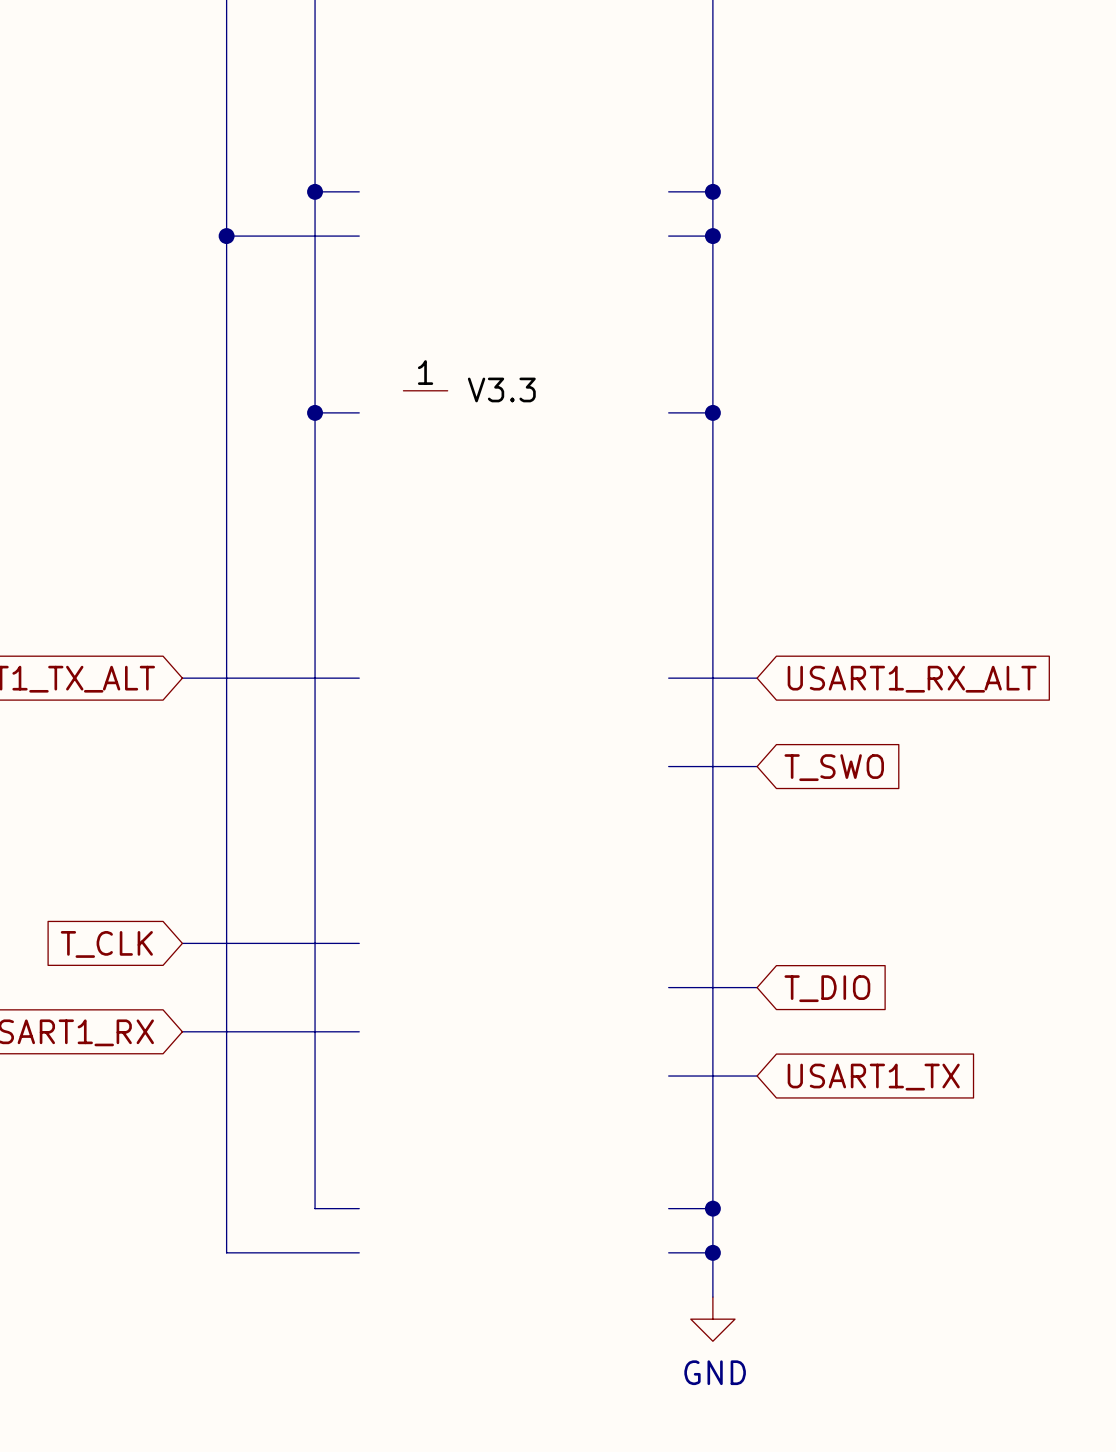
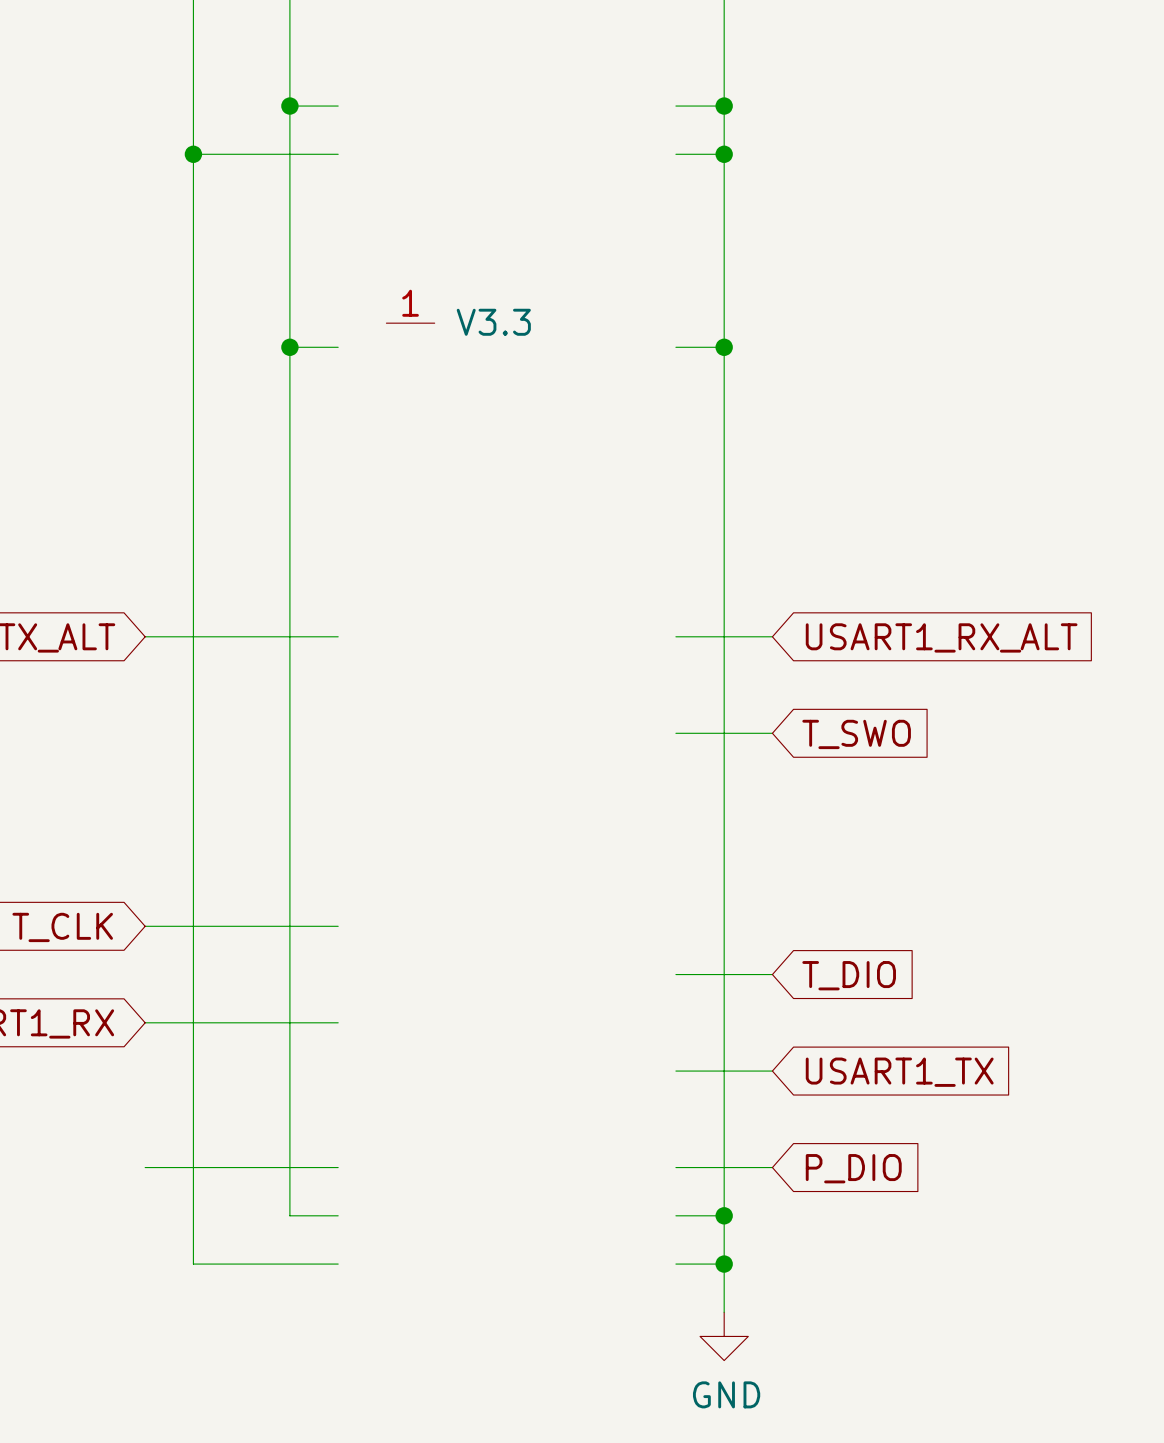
wire: none -> (145, 1167) (338, 1167)
wire: none -> (675, 1167) (772, 1167)
global label: none -> P_DIO (853, 1168)

